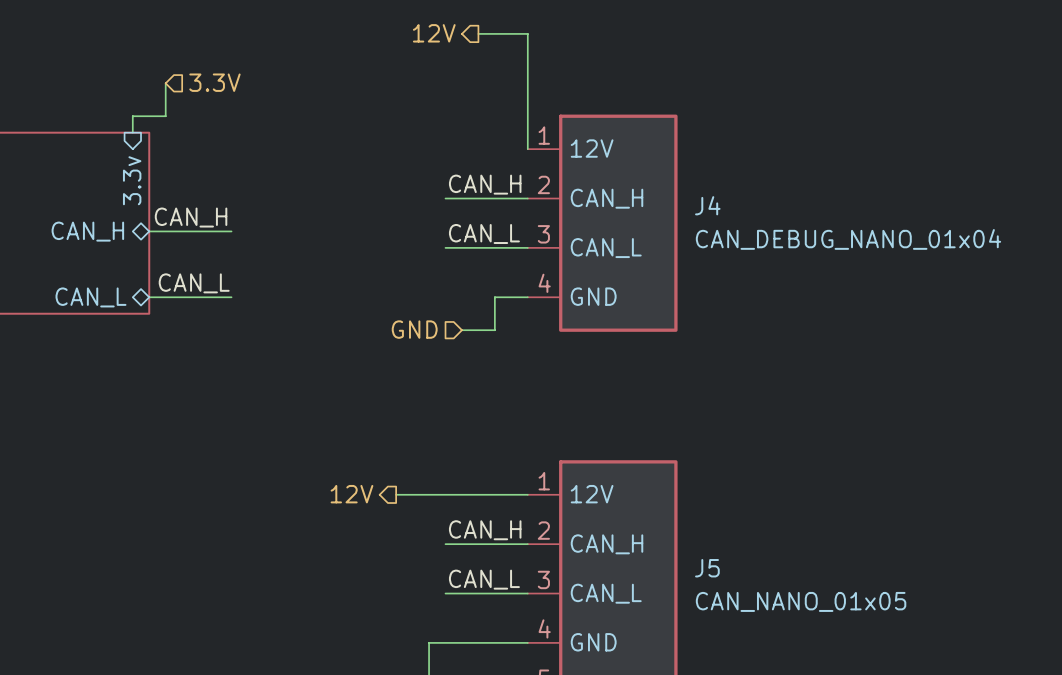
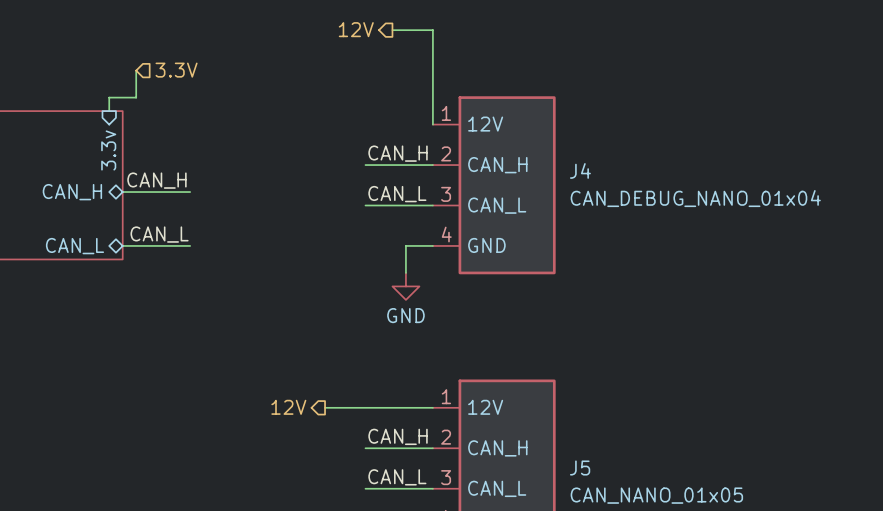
hierarchical label: GND (414, 329) -> none
wire: (461, 330) (494, 330) -> none
power symbol: none -> GND (405, 286)

